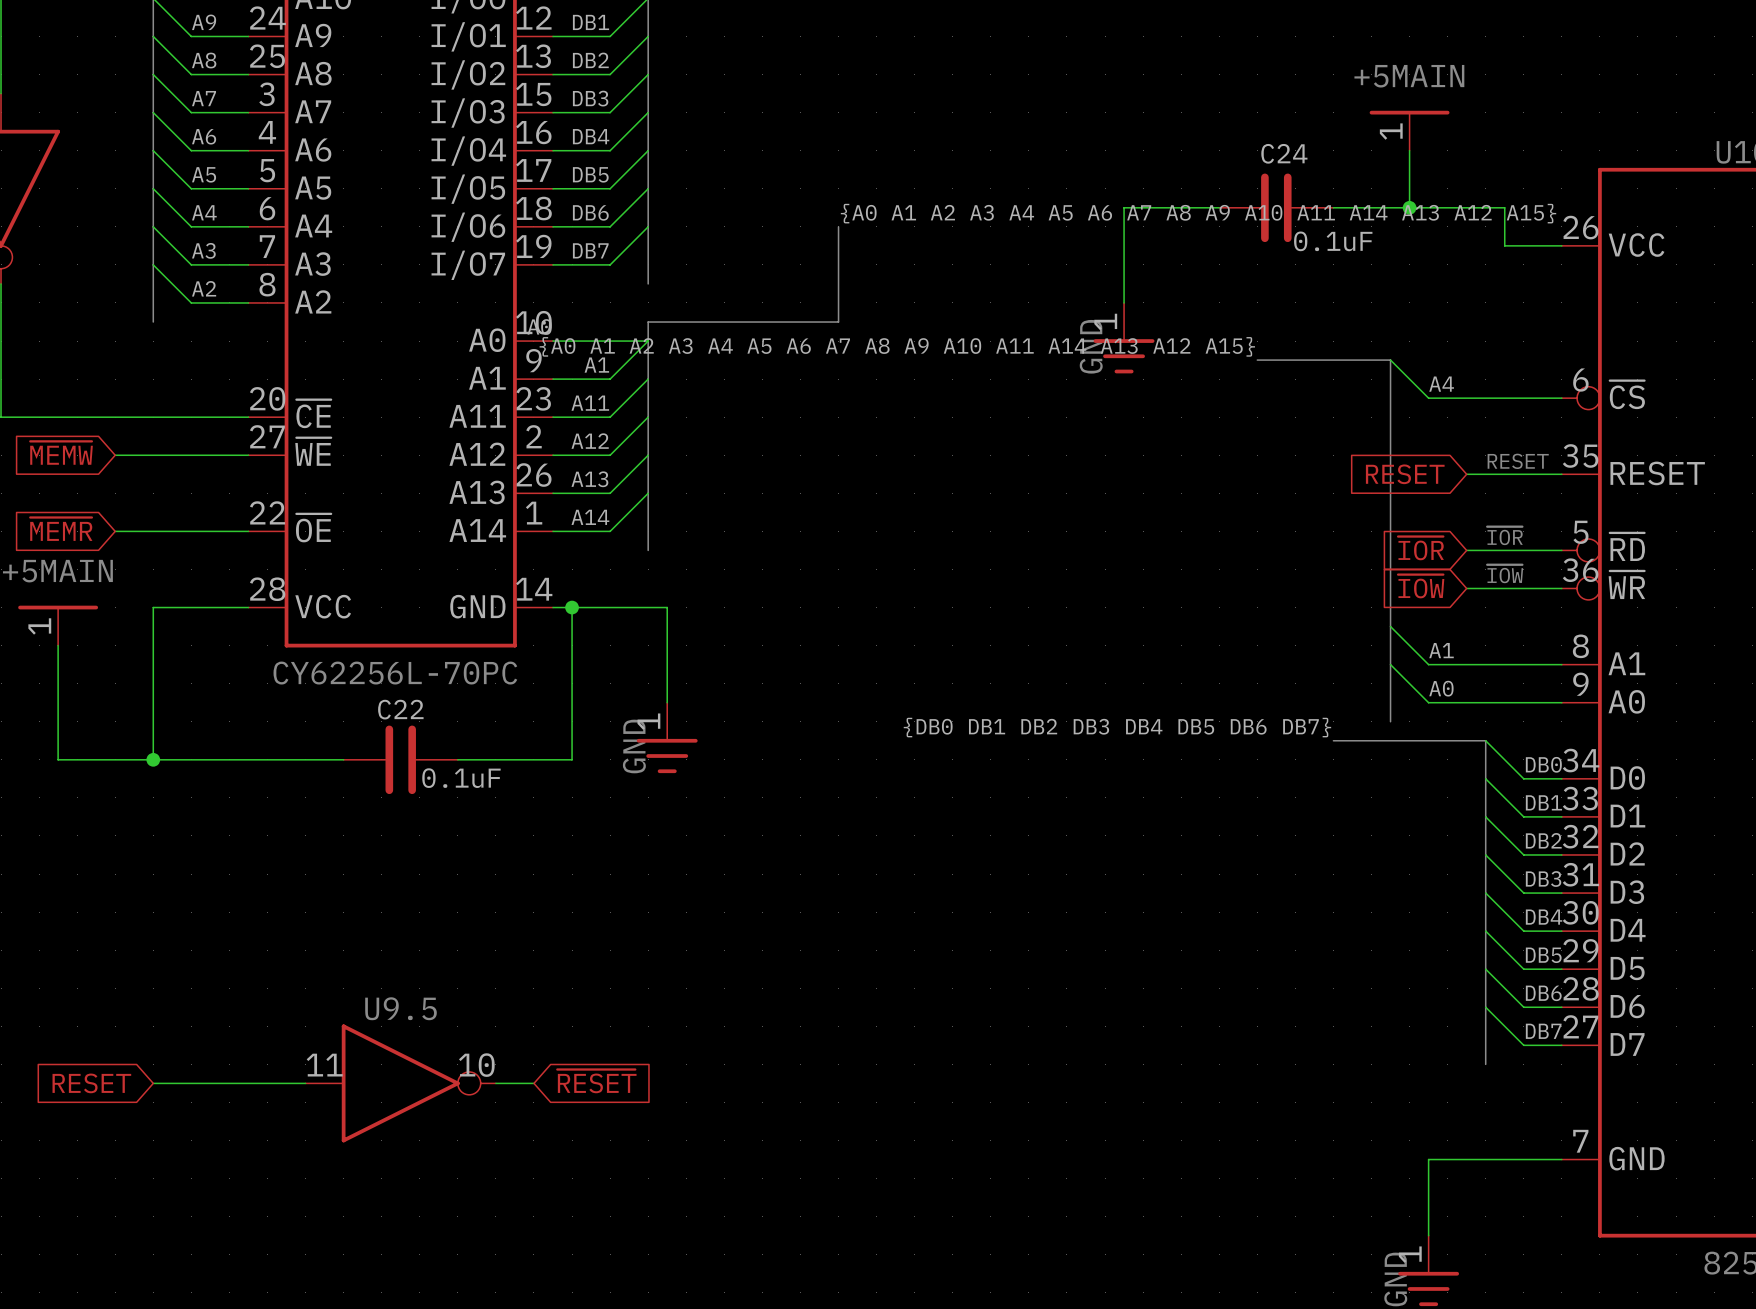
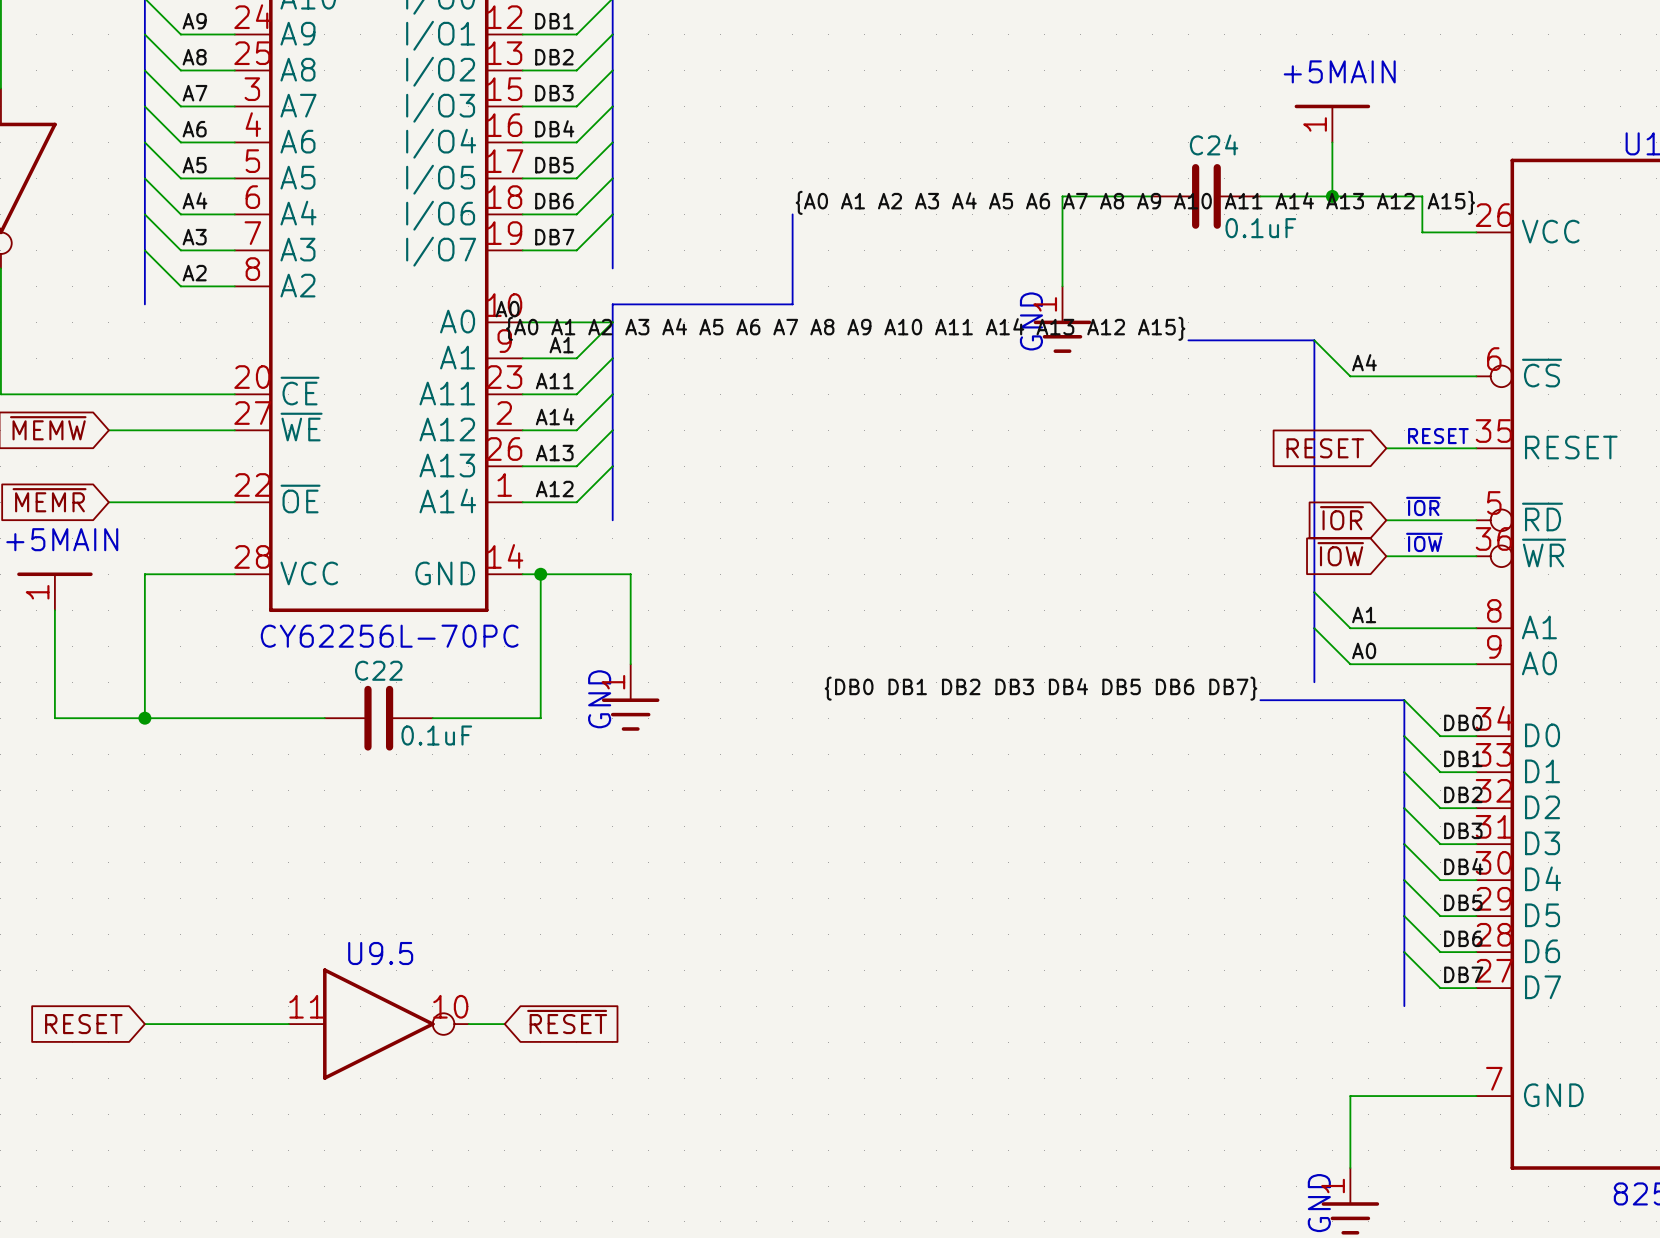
label: A12 (590, 441) -> A14 (555, 416)
label: A14 (590, 517) -> A12 (554, 489)

